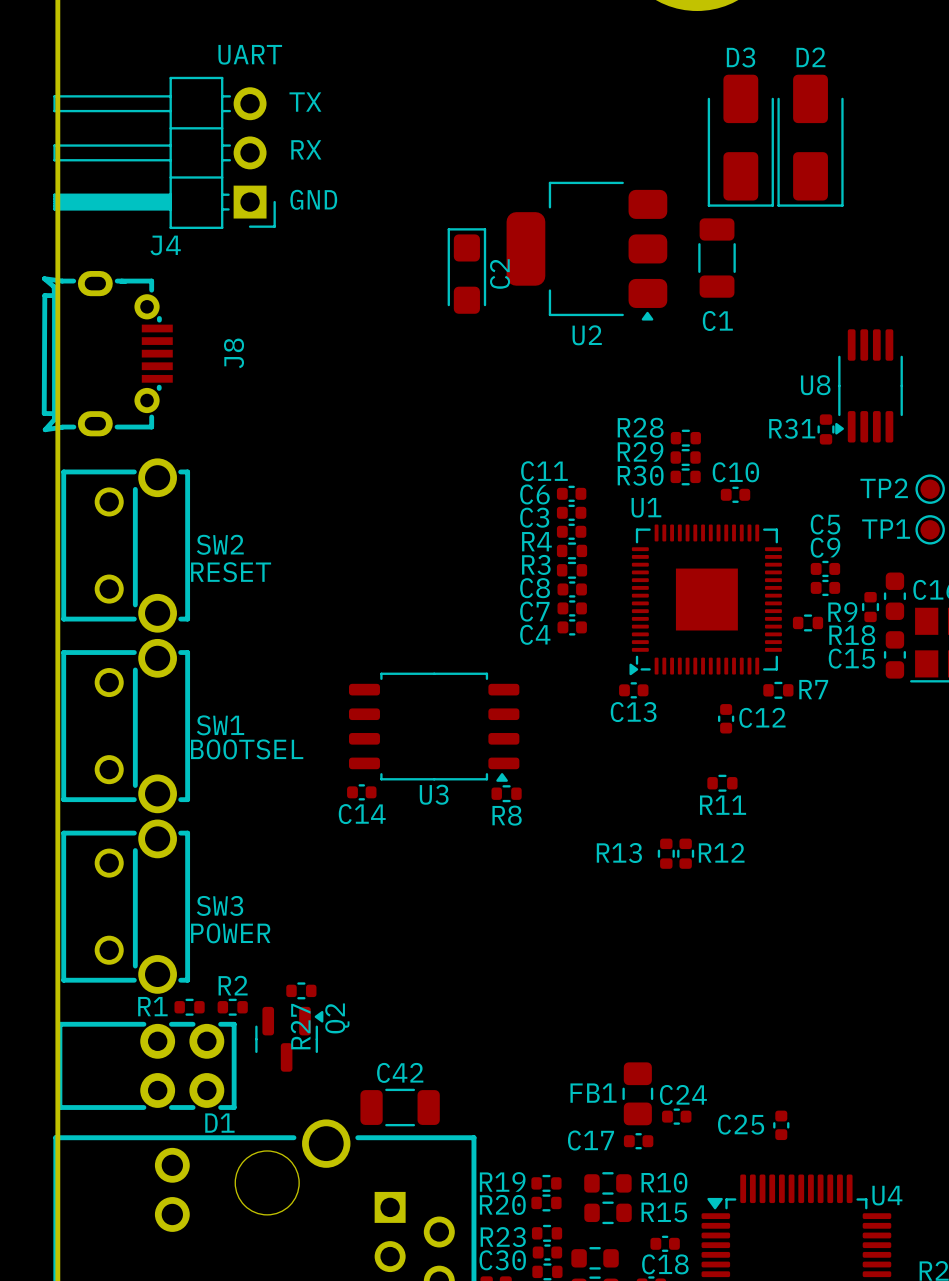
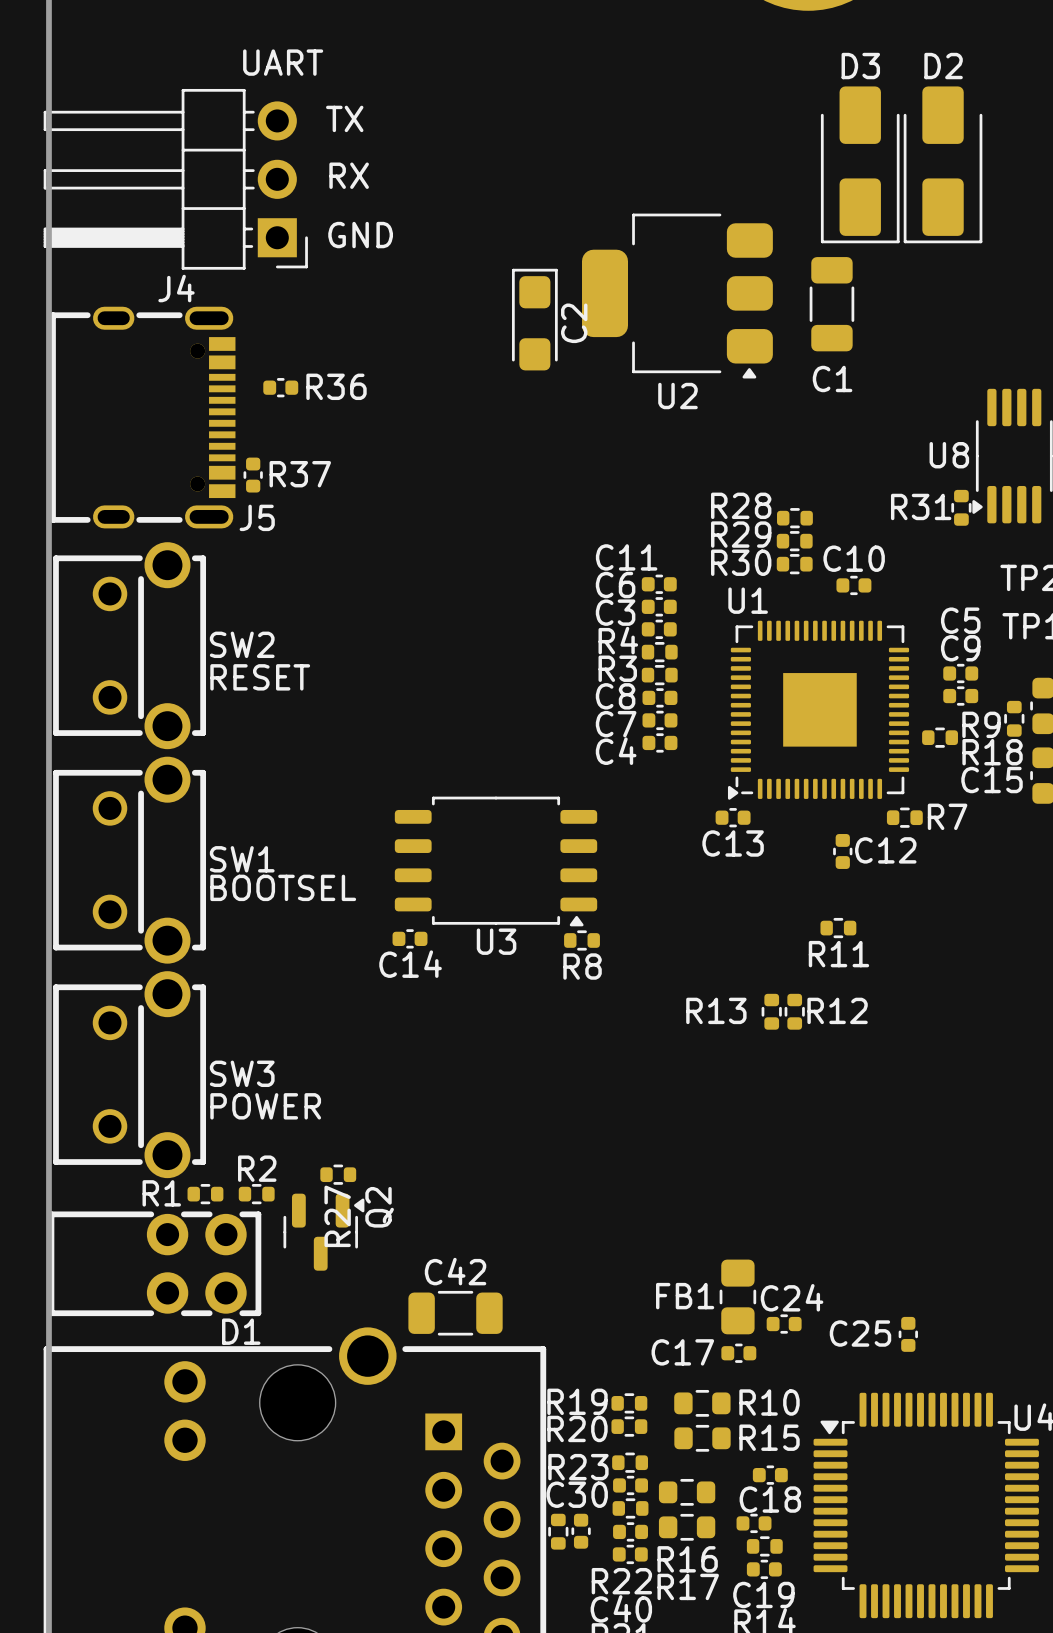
R36: none -> (280, 387)
J8: (107, 353) -> none
J5: none -> (142, 417)
R37: none -> (253, 475)

